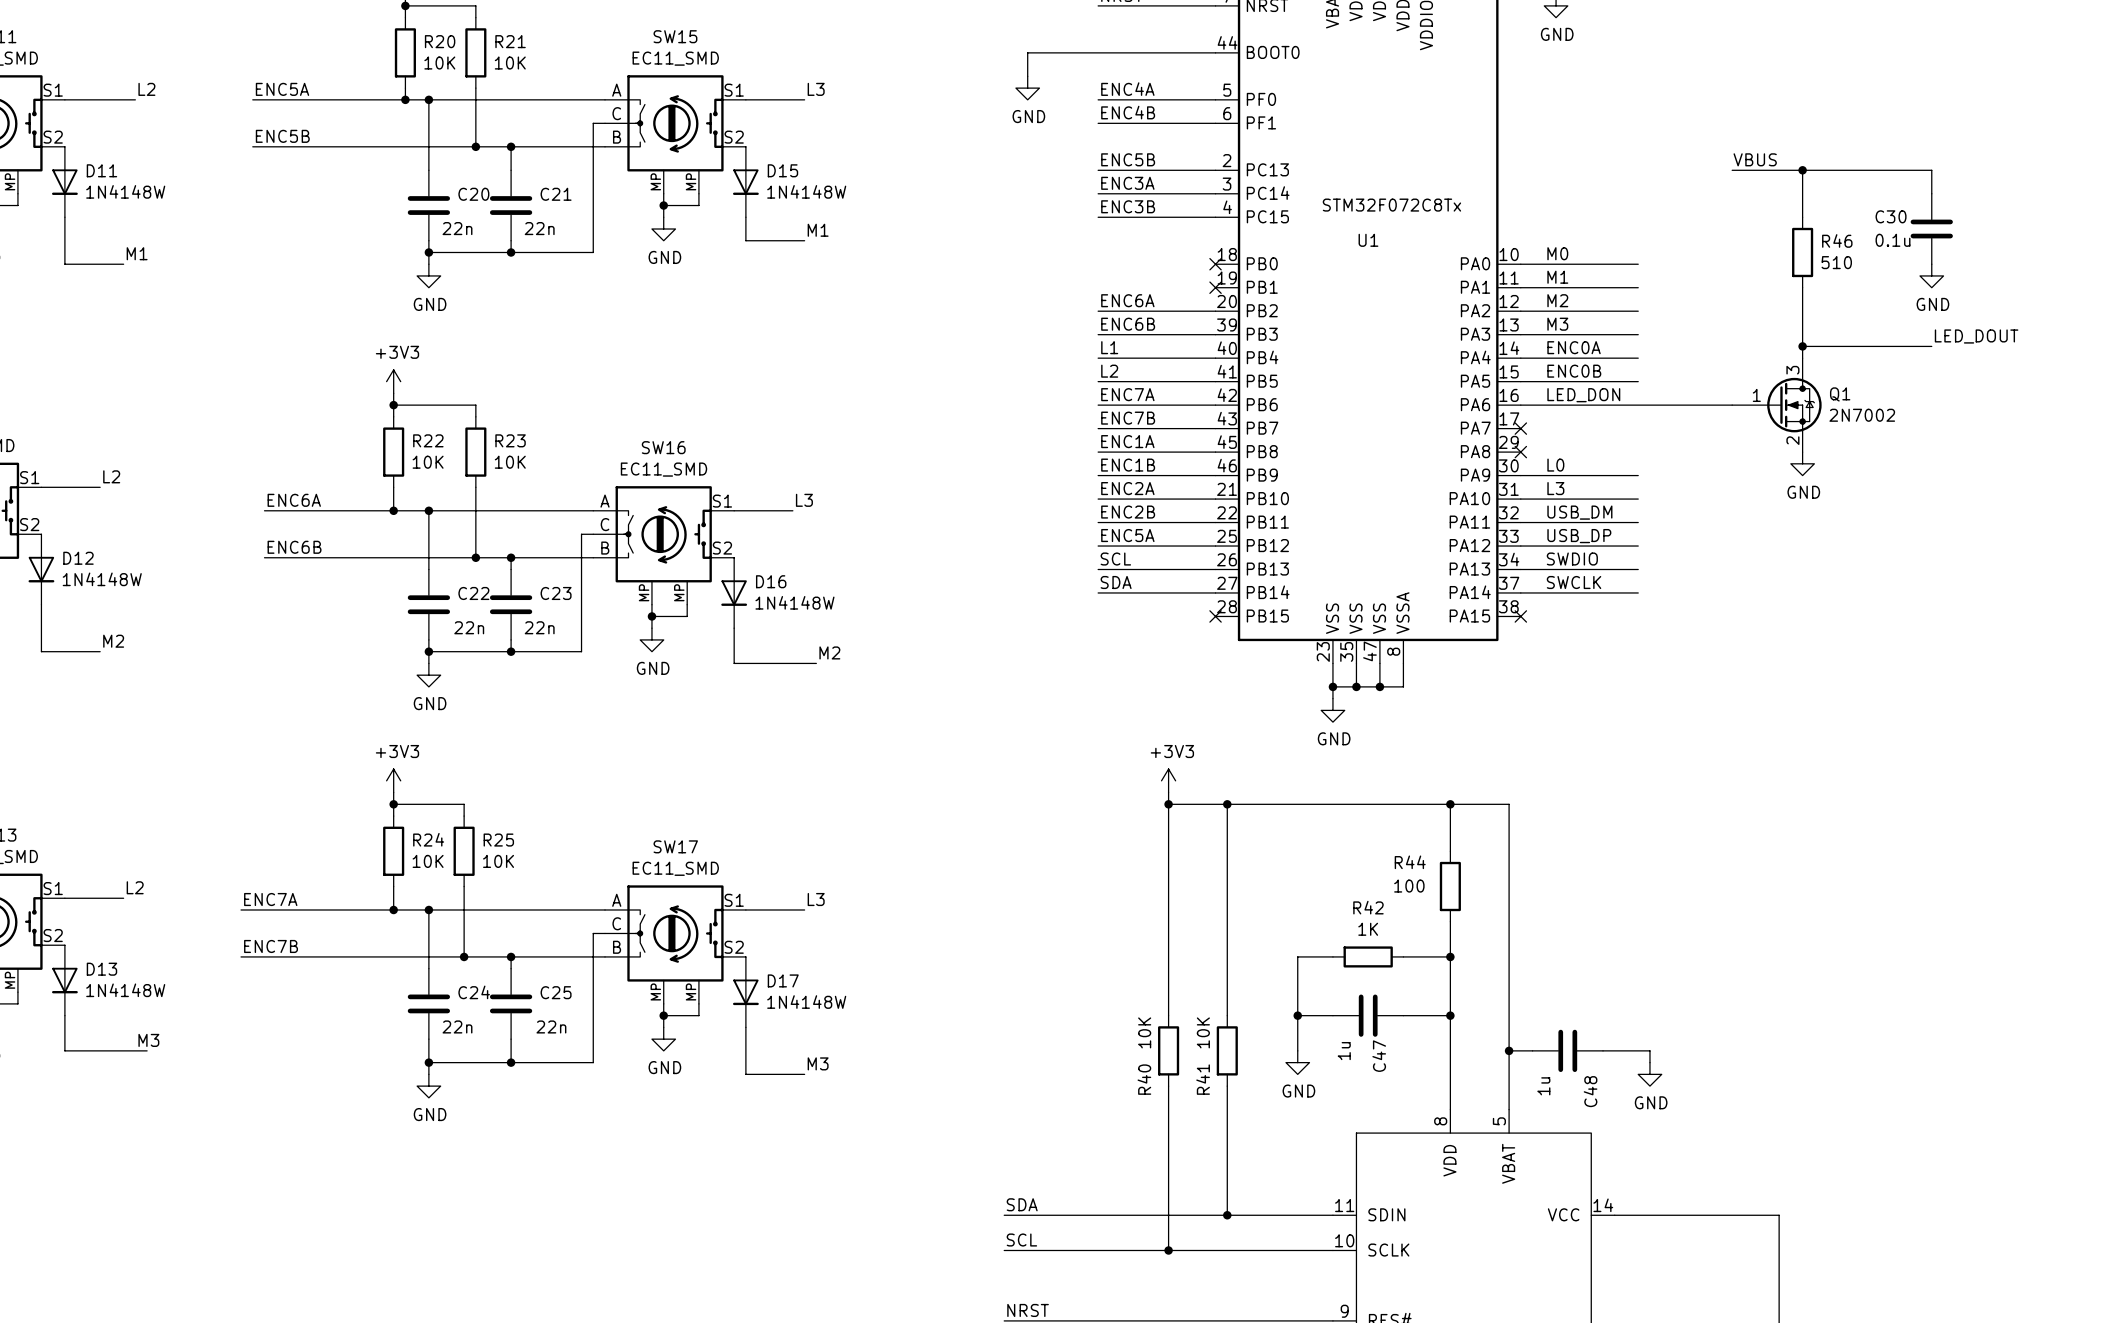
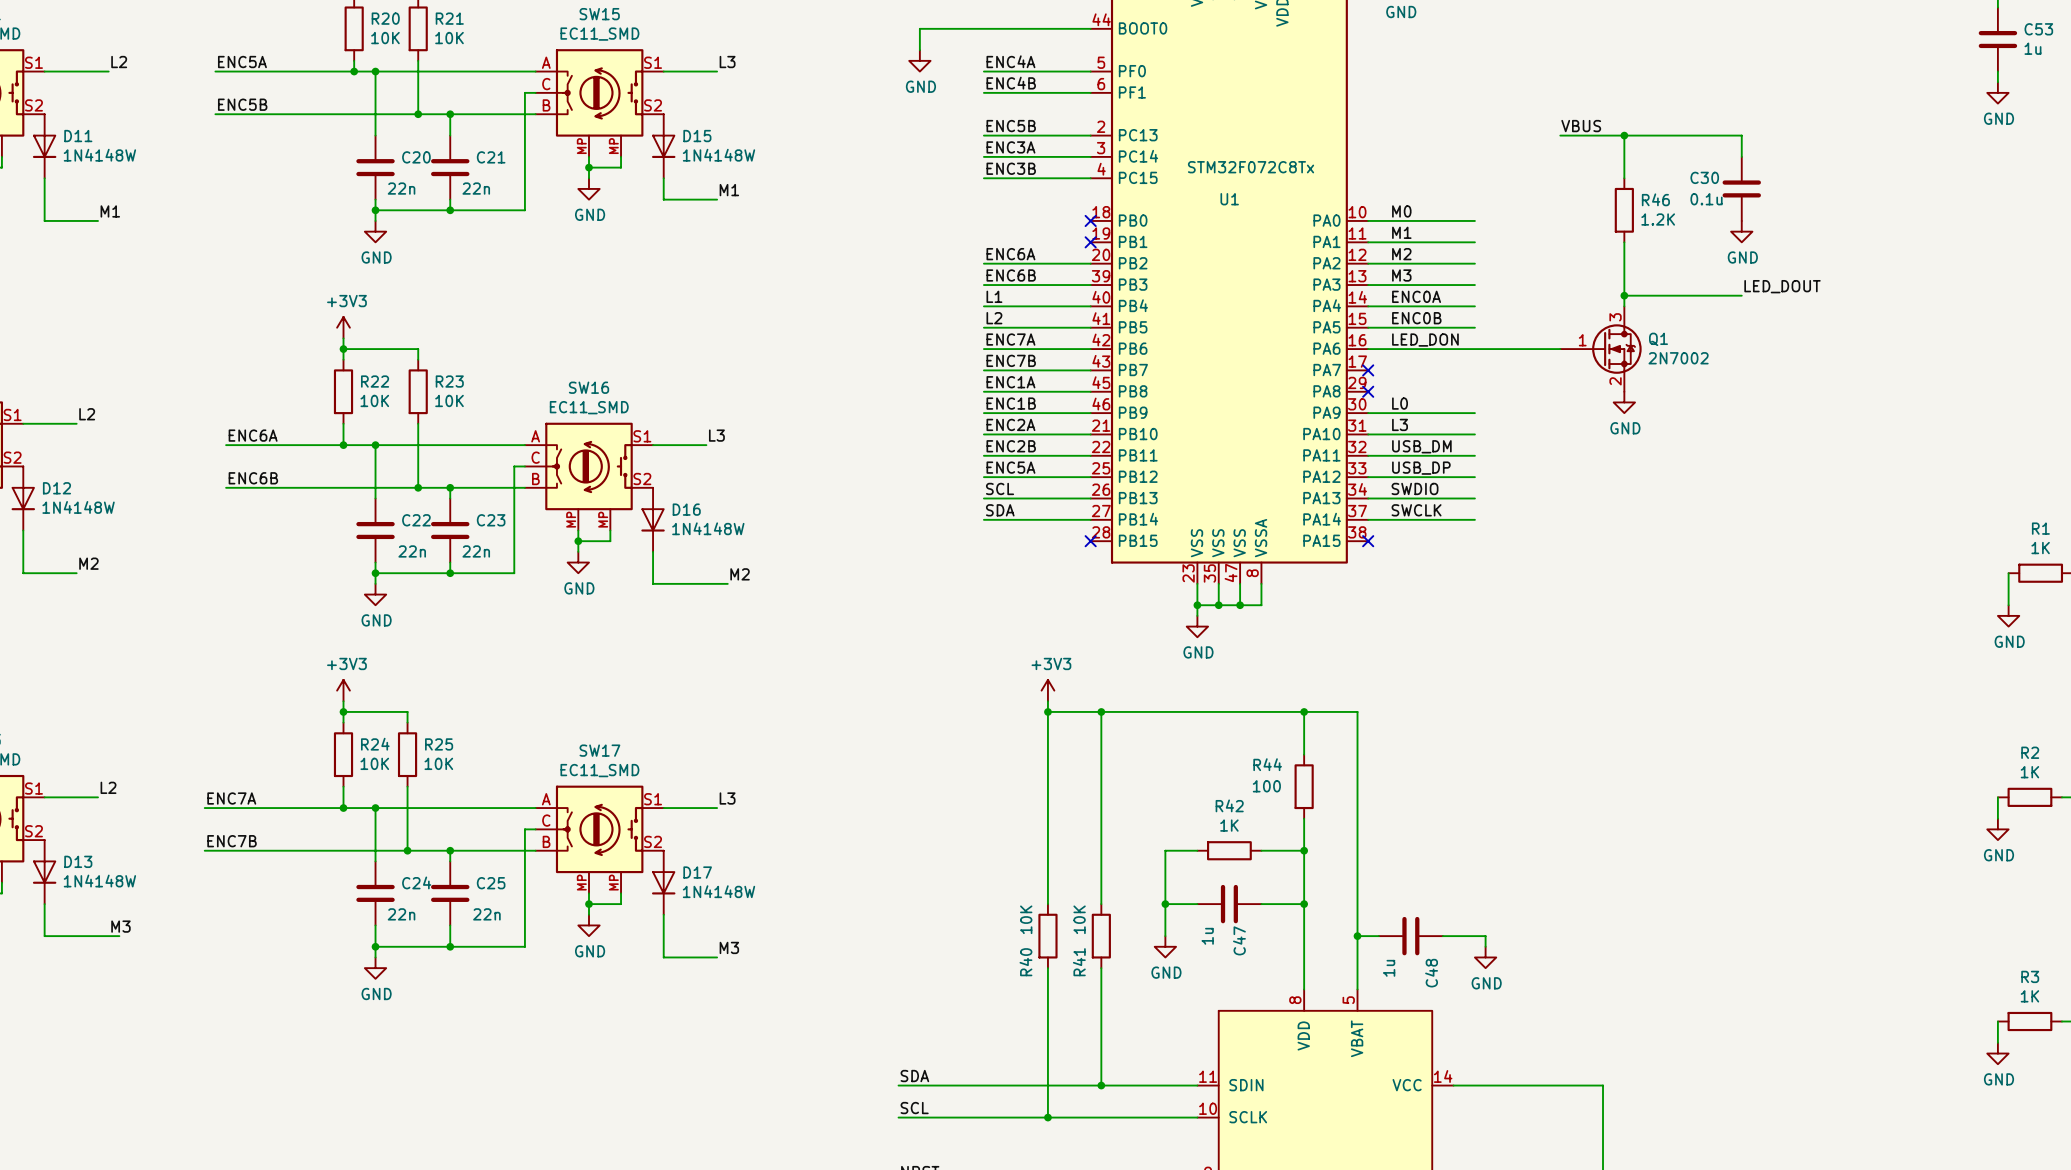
R46 value: 510 (1836, 262) -> 1.2K (1658, 219)

